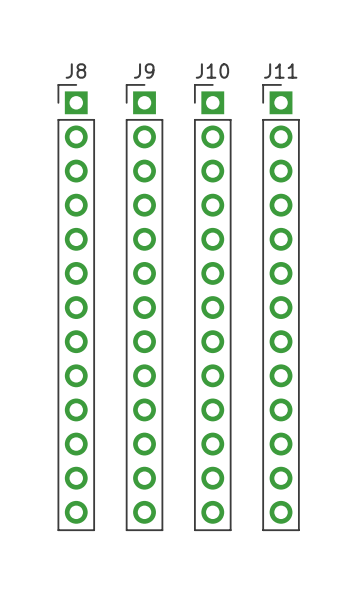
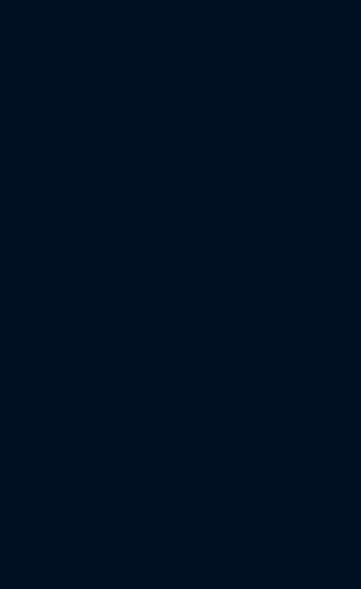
J8: (76, 307) -> none
J9: (144, 307) -> none
J10: (212, 307) -> none
J11: (281, 307) -> none

